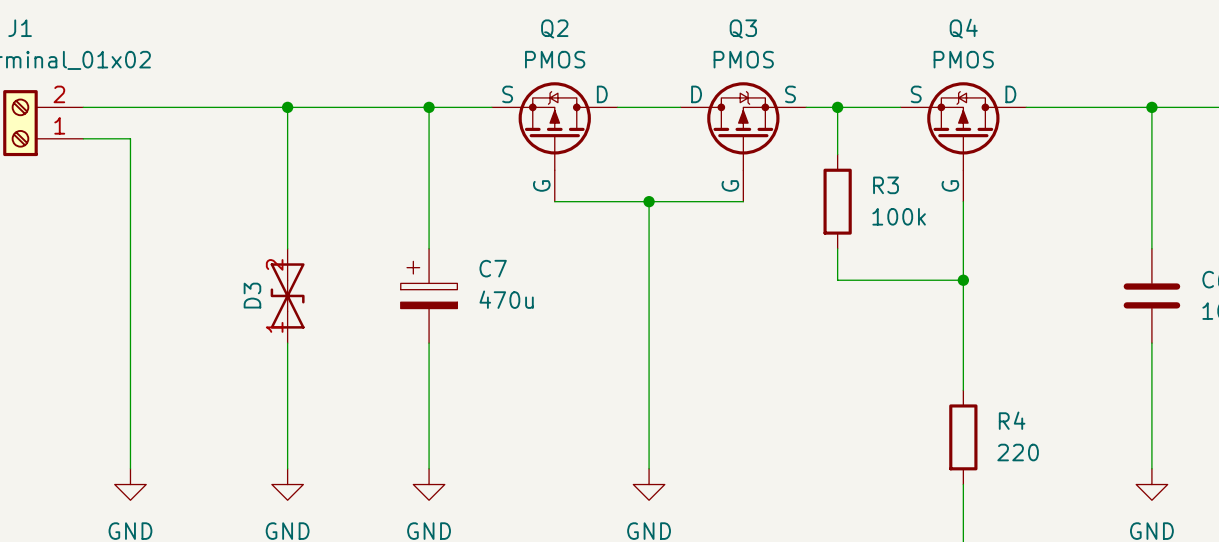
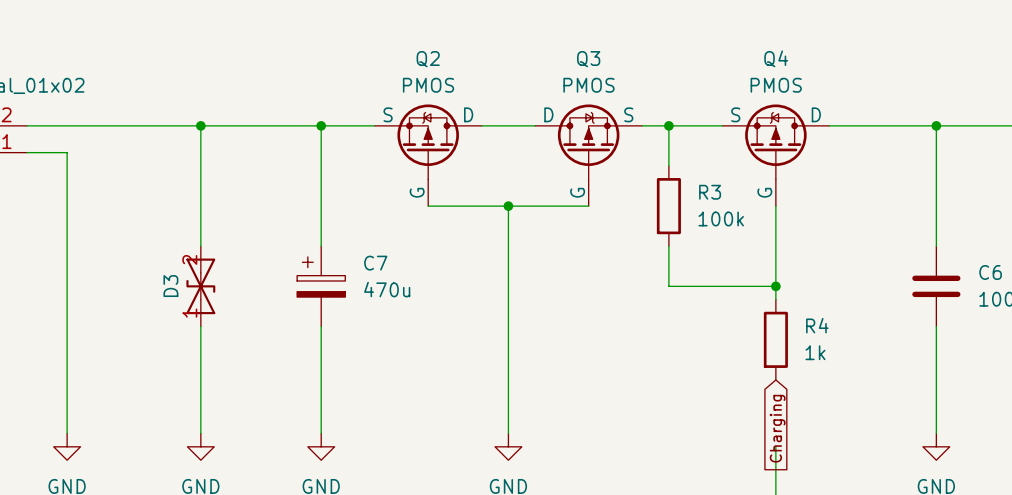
wire: (837, 280) (963, 280) -> (668, 272) (668, 286) (775, 286)
junction position: (963, 280) -> (775, 286)
wire: (963, 311) (963, 390) -> none
R4 position: (963, 437) -> (775, 339)
R4 value: 220 (1018, 452) -> 1k (815, 352)
global label: none -> Charging (777, 428)

